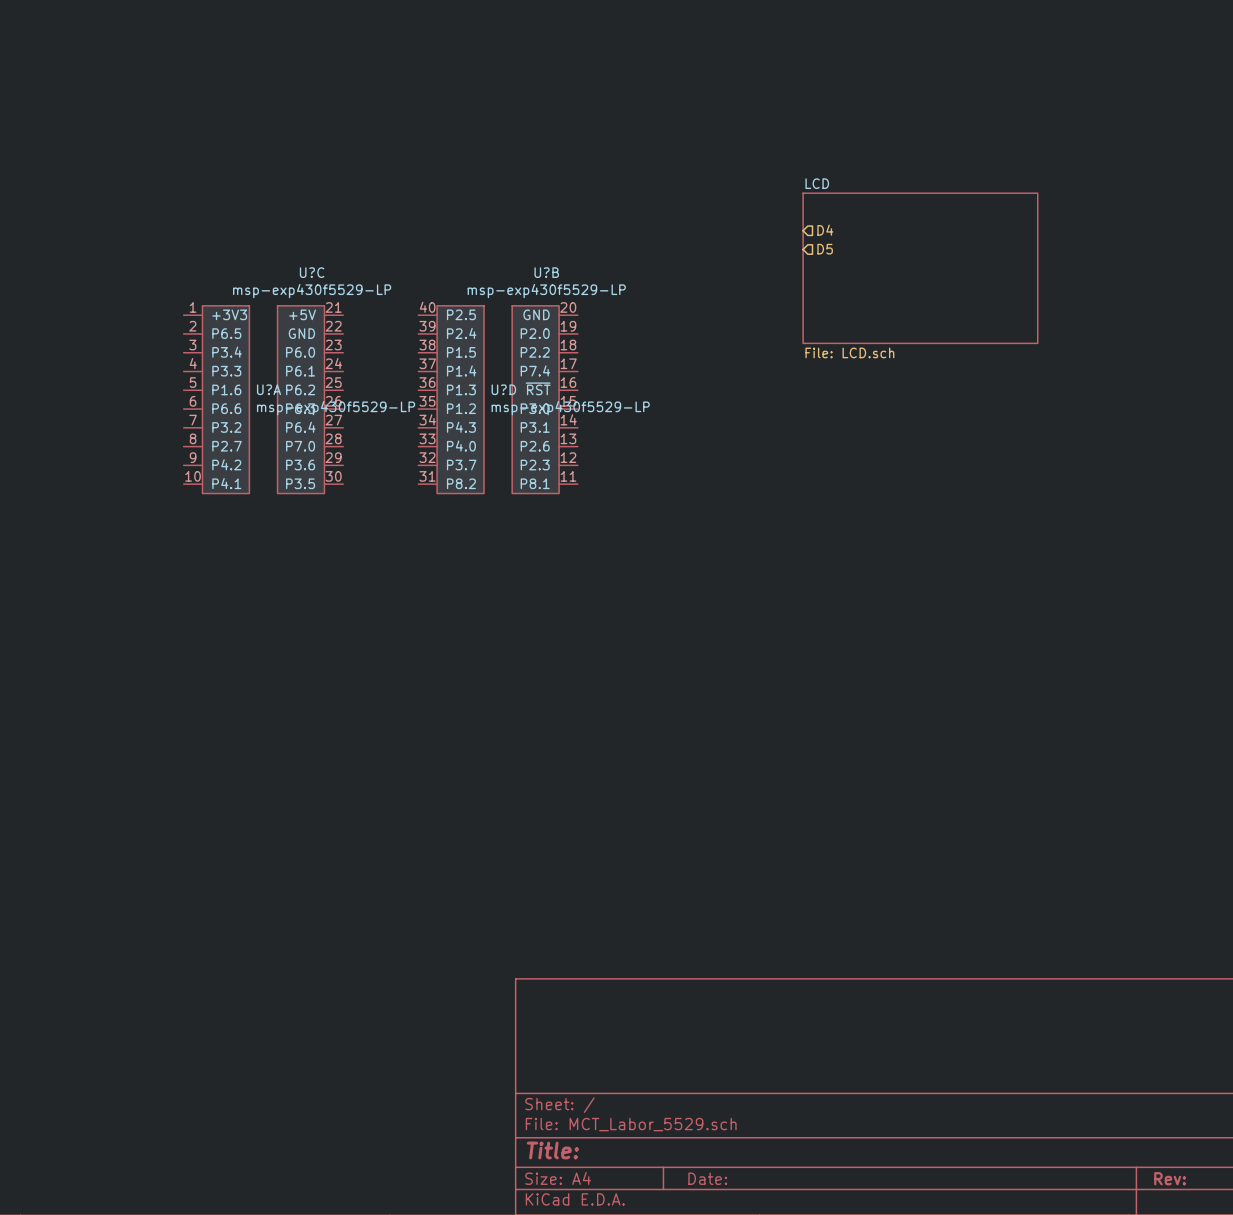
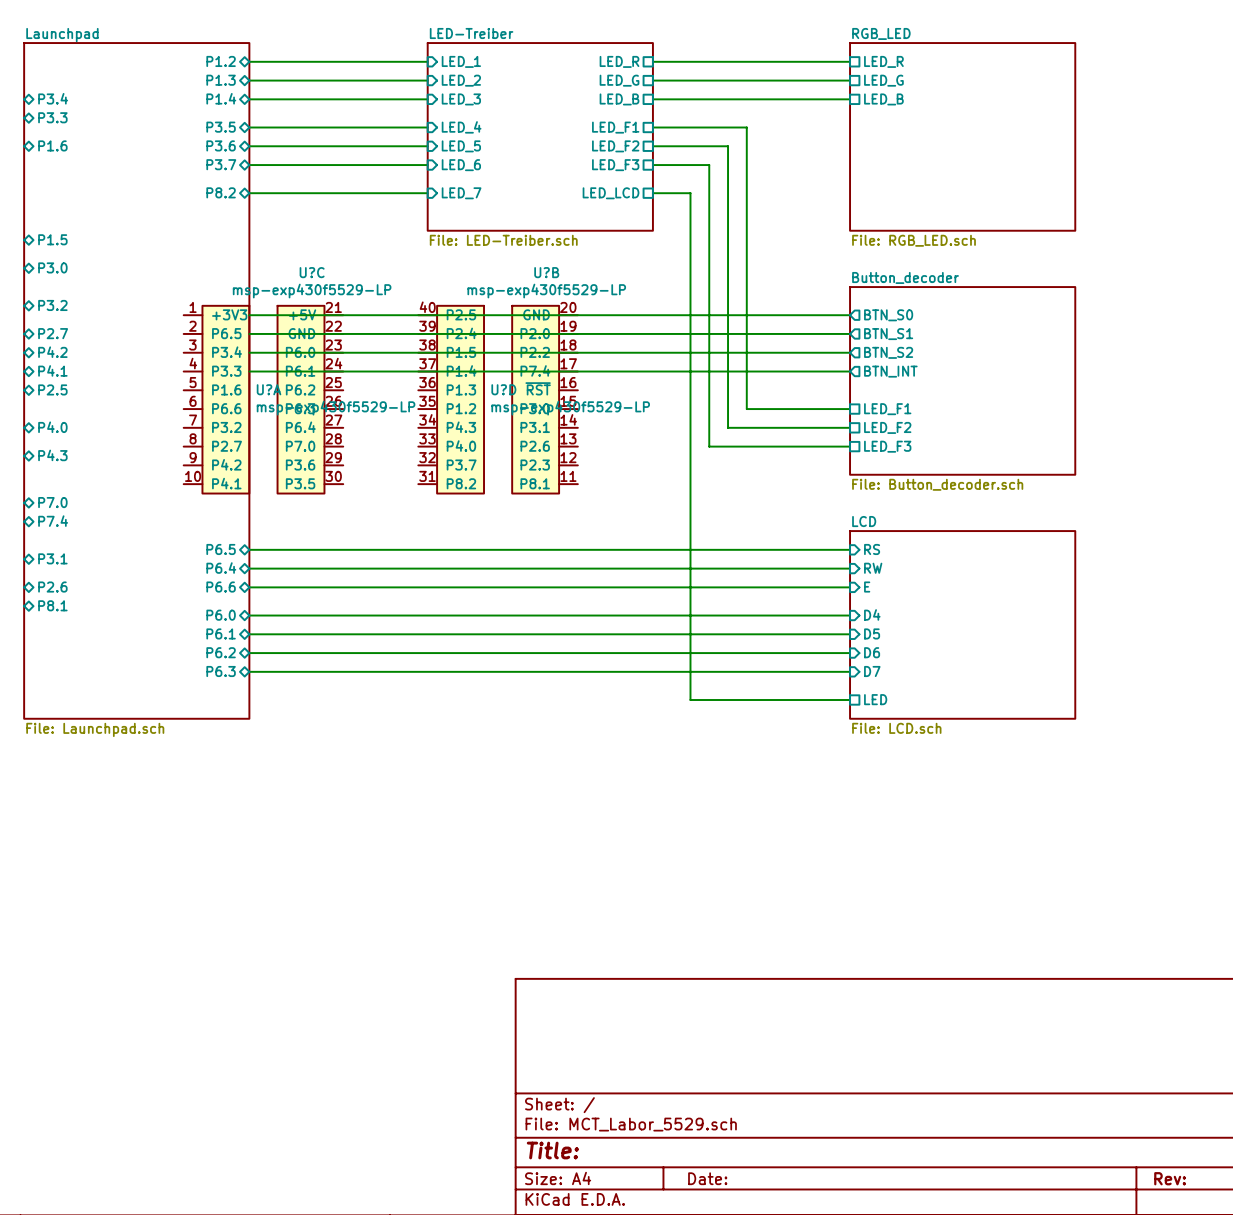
sheet pin: none -> P1.2 (221, 61)
wire: none -> (249, 61) (427, 61)
sheet pin: none -> LED_1 (461, 61)
sheet pin: none -> LED_R (619, 61)
wire: none -> (652, 61) (850, 61)
sheet pin: none -> LED_R (883, 61)
sheet pin: none -> P1.3 (221, 80)
wire: none -> (249, 80) (427, 80)
sheet pin: none -> LED_2 (461, 80)
sheet pin: none -> LED_G (619, 80)
wire: none -> (652, 80) (850, 80)
sheet pin: none -> LED_G (883, 80)
sheet pin: none -> P3.4 (53, 98)
sheet pin: none -> P1.4 (221, 98)
wire: none -> (249, 99) (427, 99)
sheet pin: none -> LED_3 (461, 99)
sheet pin: none -> LED_B (619, 99)
wire: none -> (652, 99) (850, 99)
sheet pin: none -> LED_B (883, 99)
sheet pin: none -> P3.3 (52, 117)
sheet pin: none -> P3.5 (221, 127)
wire: none -> (249, 127) (427, 127)
sheet pin: none -> LED_4 (461, 127)
sheet pin: none -> LED_F1 (615, 127)
wire: none -> (652, 127) (746, 127) (746, 409) (850, 409)
sheet LED-Treiber: none -> File: LED-Treiber.sch (540, 136)
sheet RGB_LED: none -> File: RGB_LED.sch (962, 136)
sheet pin: none -> P1.6 (52, 145)
sheet pin: none -> P3.6 (221, 145)
wire: none -> (249, 146) (427, 146)
sheet pin: none -> LED_5 (461, 146)
sheet pin: none -> LED_F2 (615, 146)
wire: none -> (652, 146) (728, 146) (728, 427) (850, 427)
sheet pin: none -> P3.7 (221, 164)
wire: none -> (249, 165) (427, 165)
sheet pin: none -> LED_6 (461, 165)
sheet pin: none -> LED_F3 (615, 165)
wire: none -> (652, 165) (709, 165) (709, 446) (850, 446)
sheet pin: none -> P8.2 (221, 192)
wire: none -> (249, 193) (427, 193)
sheet pin: none -> LED_7 (461, 193)
sheet pin: none -> LED_LCD (611, 193)
wire: none -> (652, 193) (690, 193) (690, 700) (850, 700)
hierarchical label: D4 (825, 230) -> none
sheet pin: none -> P1.5 (52, 239)
hierarchical label: D5 (825, 249) -> none
sheet pin: none -> P3.0 (52, 267)
sheet LCD: File: LCD.sch (920, 268) -> none
sheet pin: none -> P3.2 (52, 305)
wire: none -> (249, 315) (850, 315)
sheet pin: none -> BTN_S0 (888, 315)
sheet pin: none -> P2.7 (53, 333)
wire: none -> (249, 333) (850, 333)
sheet pin: none -> BTN_S1 (888, 334)
sheet pin: none -> P4.2 (52, 352)
wire: none -> (249, 352) (850, 352)
sheet pin: none -> BTN_S2 (888, 352)
sheet pin: none -> P4.1 (52, 370)
wire: none -> (249, 371) (850, 371)
sheet pin: none -> BTN_INT (890, 371)
sheet Launchpad: none -> File: Launchpad.sch (136, 380)
sheet Button_decoder: none -> File: Button_decoder.sch (962, 380)
sheet pin: none -> P2.5 (52, 389)
sheet pin: none -> LED_F1 (887, 409)
sheet pin: none -> P4.0 (52, 427)
sheet pin: none -> LED_F2 (887, 427)
sheet pin: none -> LED_F3 (887, 446)
sheet pin: none -> P4.3 (52, 455)
sheet pin: none -> P7.0 (52, 502)
sheet pin: none -> P7.4 (53, 521)
sheet pin: none -> P6.5 (221, 549)
wire: none -> (249, 549) (850, 549)
sheet pin: none -> RS (872, 549)
sheet pin: none -> P3.1 (52, 558)
sheet pin: none -> P6.4 (221, 568)
wire: none -> (249, 568) (850, 568)
sheet pin: none -> RW (873, 568)
sheet pin: none -> P2.6 (52, 587)
sheet pin: none -> P6.6 (221, 587)
wire: none -> (249, 587) (850, 587)
sheet pin: none -> E (867, 587)
sheet pin: none -> P8.1 (52, 605)
sheet pin: none -> D4 (872, 614)
sheet pin: none -> P6.0 (221, 615)
wire: none -> (249, 615) (850, 615)
sheet LCD: none -> File: LCD.sch (962, 624)
sheet pin: none -> P6.1 (221, 633)
sheet pin: none -> D5 (872, 633)
wire: none -> (249, 634) (850, 634)
sheet pin: none -> P6.2 (221, 652)
sheet pin: none -> D6 (872, 652)
wire: none -> (249, 653) (850, 653)
sheet pin: none -> P6.3 (221, 671)
wire: none -> (249, 671) (850, 671)
sheet pin: none -> D7 (872, 671)
sheet pin: none -> LED (875, 699)

